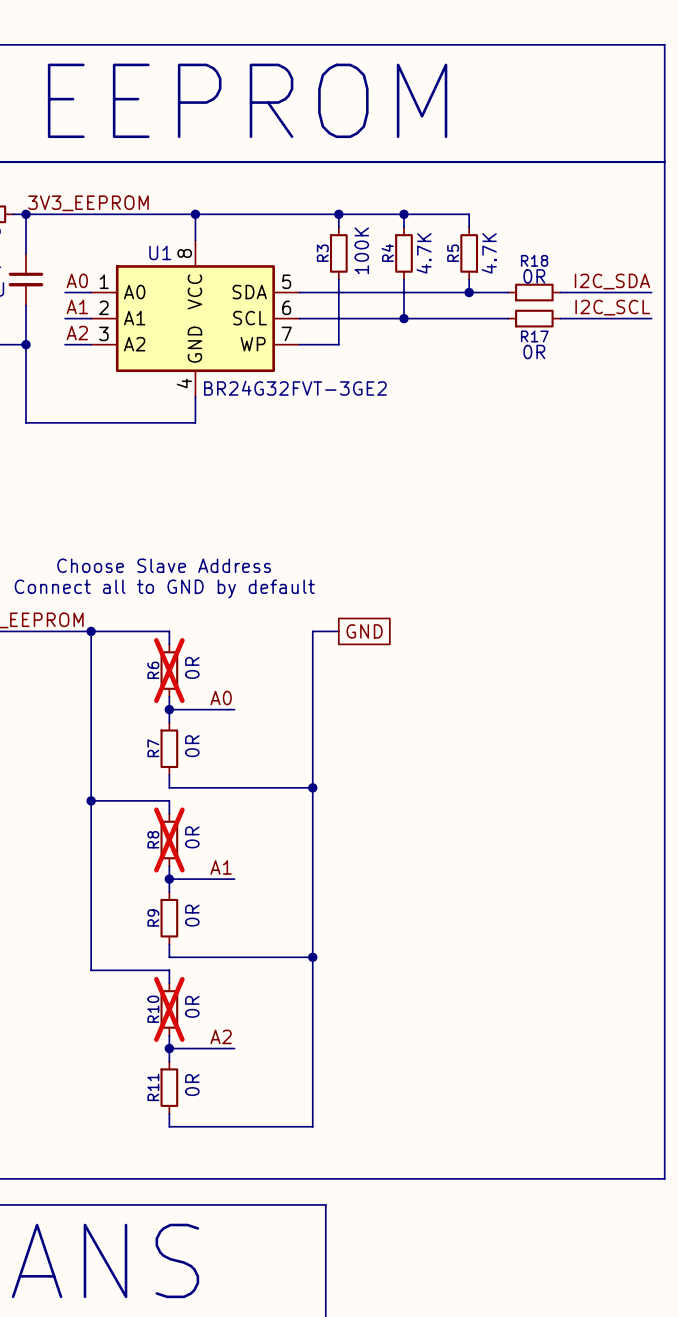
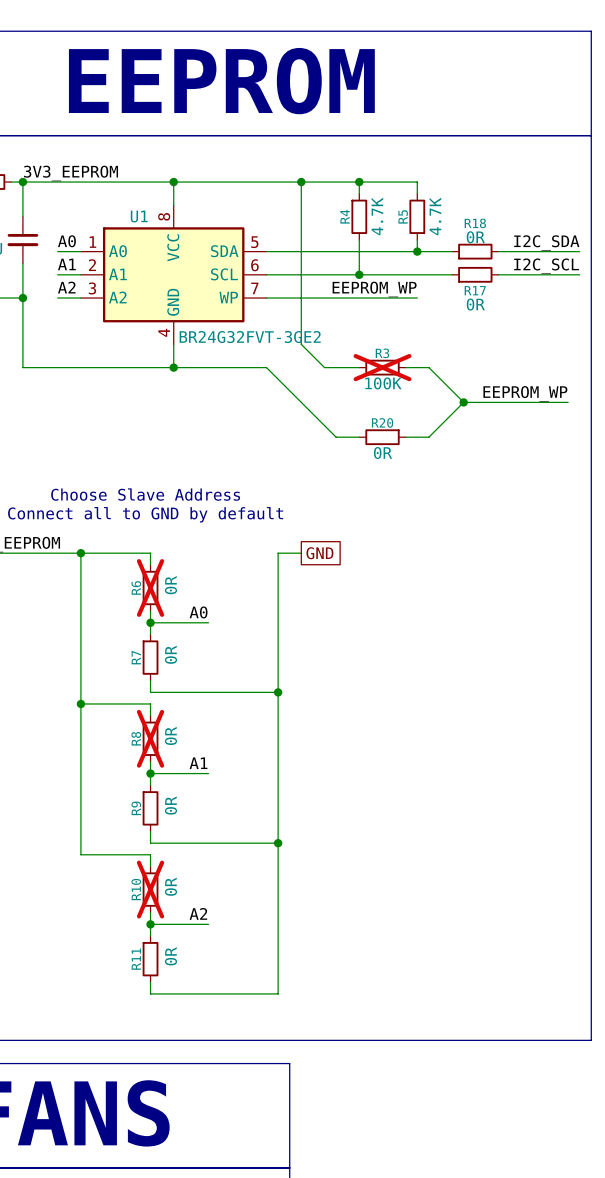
wire: none -> (301, 193) (301, 240)
R3 rotation: 0° (338, 253) -> 90° clockwise (382, 367)
R3 position: (338, 253) -> (382, 367)
label: none -> EEPROM_WP (374, 289)
wire: none -> (417, 298) (301, 298) (301, 344) (324, 367) (359, 367)
wire: none -> (173, 367) (266, 367) (336, 437) (359, 437)
junction: none -> (173, 367)
R3 do-not-place cross: none -> (382, 367)
wire: none -> (405, 367) (428, 367) (463, 402)
label: none -> EEPROM_WP (525, 393)
wire: none -> (463, 402) (428, 437) (405, 437)
wire: none -> (463, 402) (568, 402)
junction: none -> (463, 402)
R20: none -> 0R (382, 437)

